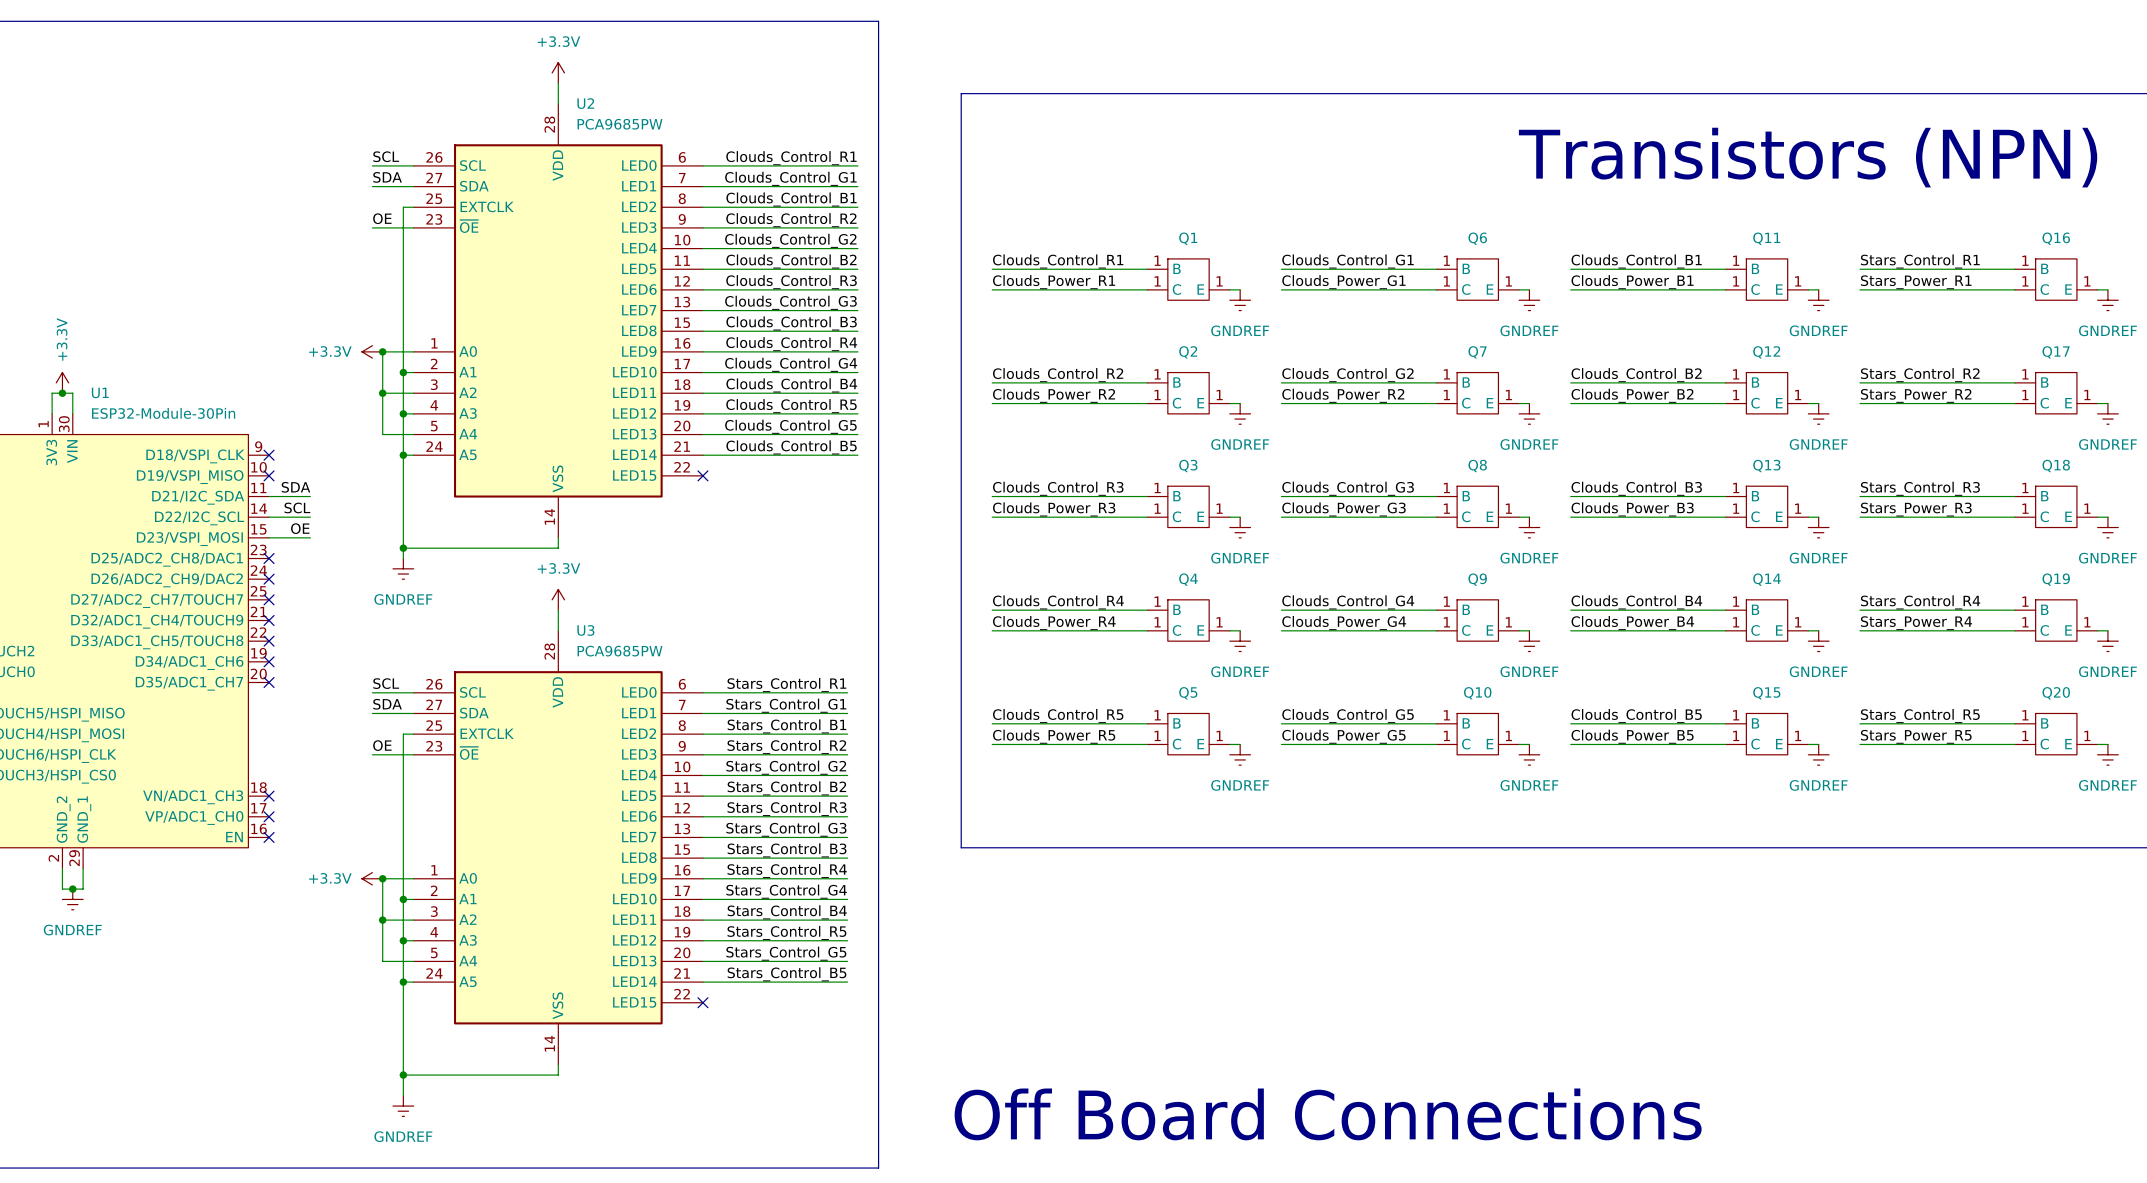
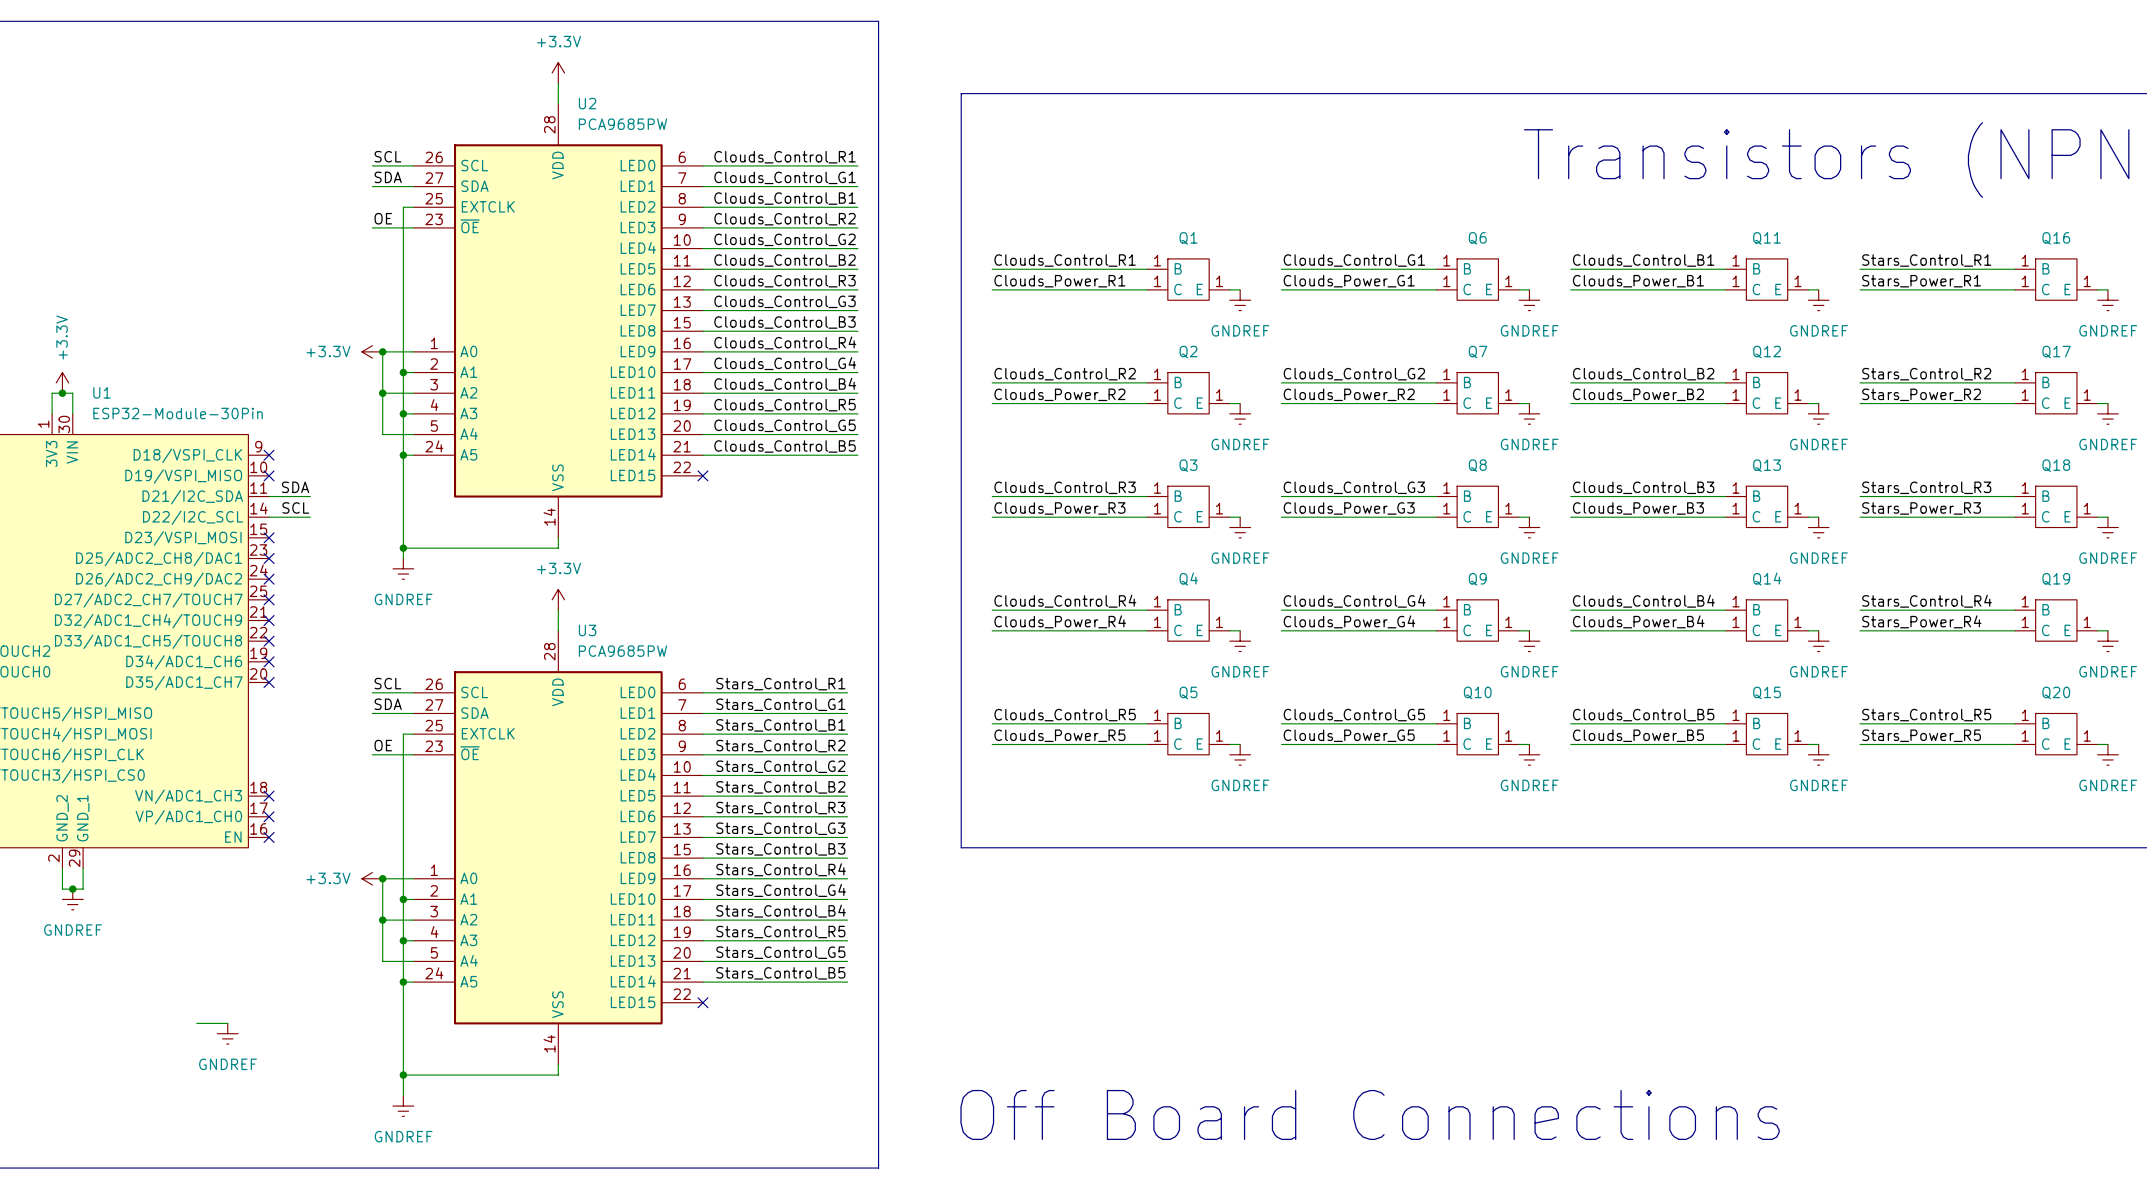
label: OE (300, 528) -> none
wire: (269, 537) (310, 537) -> none
no-connect mark: none -> (269, 537)
wire: none -> (196, 1023) (227, 1023)
power symbol: none -> GNDREF (227, 1033)

